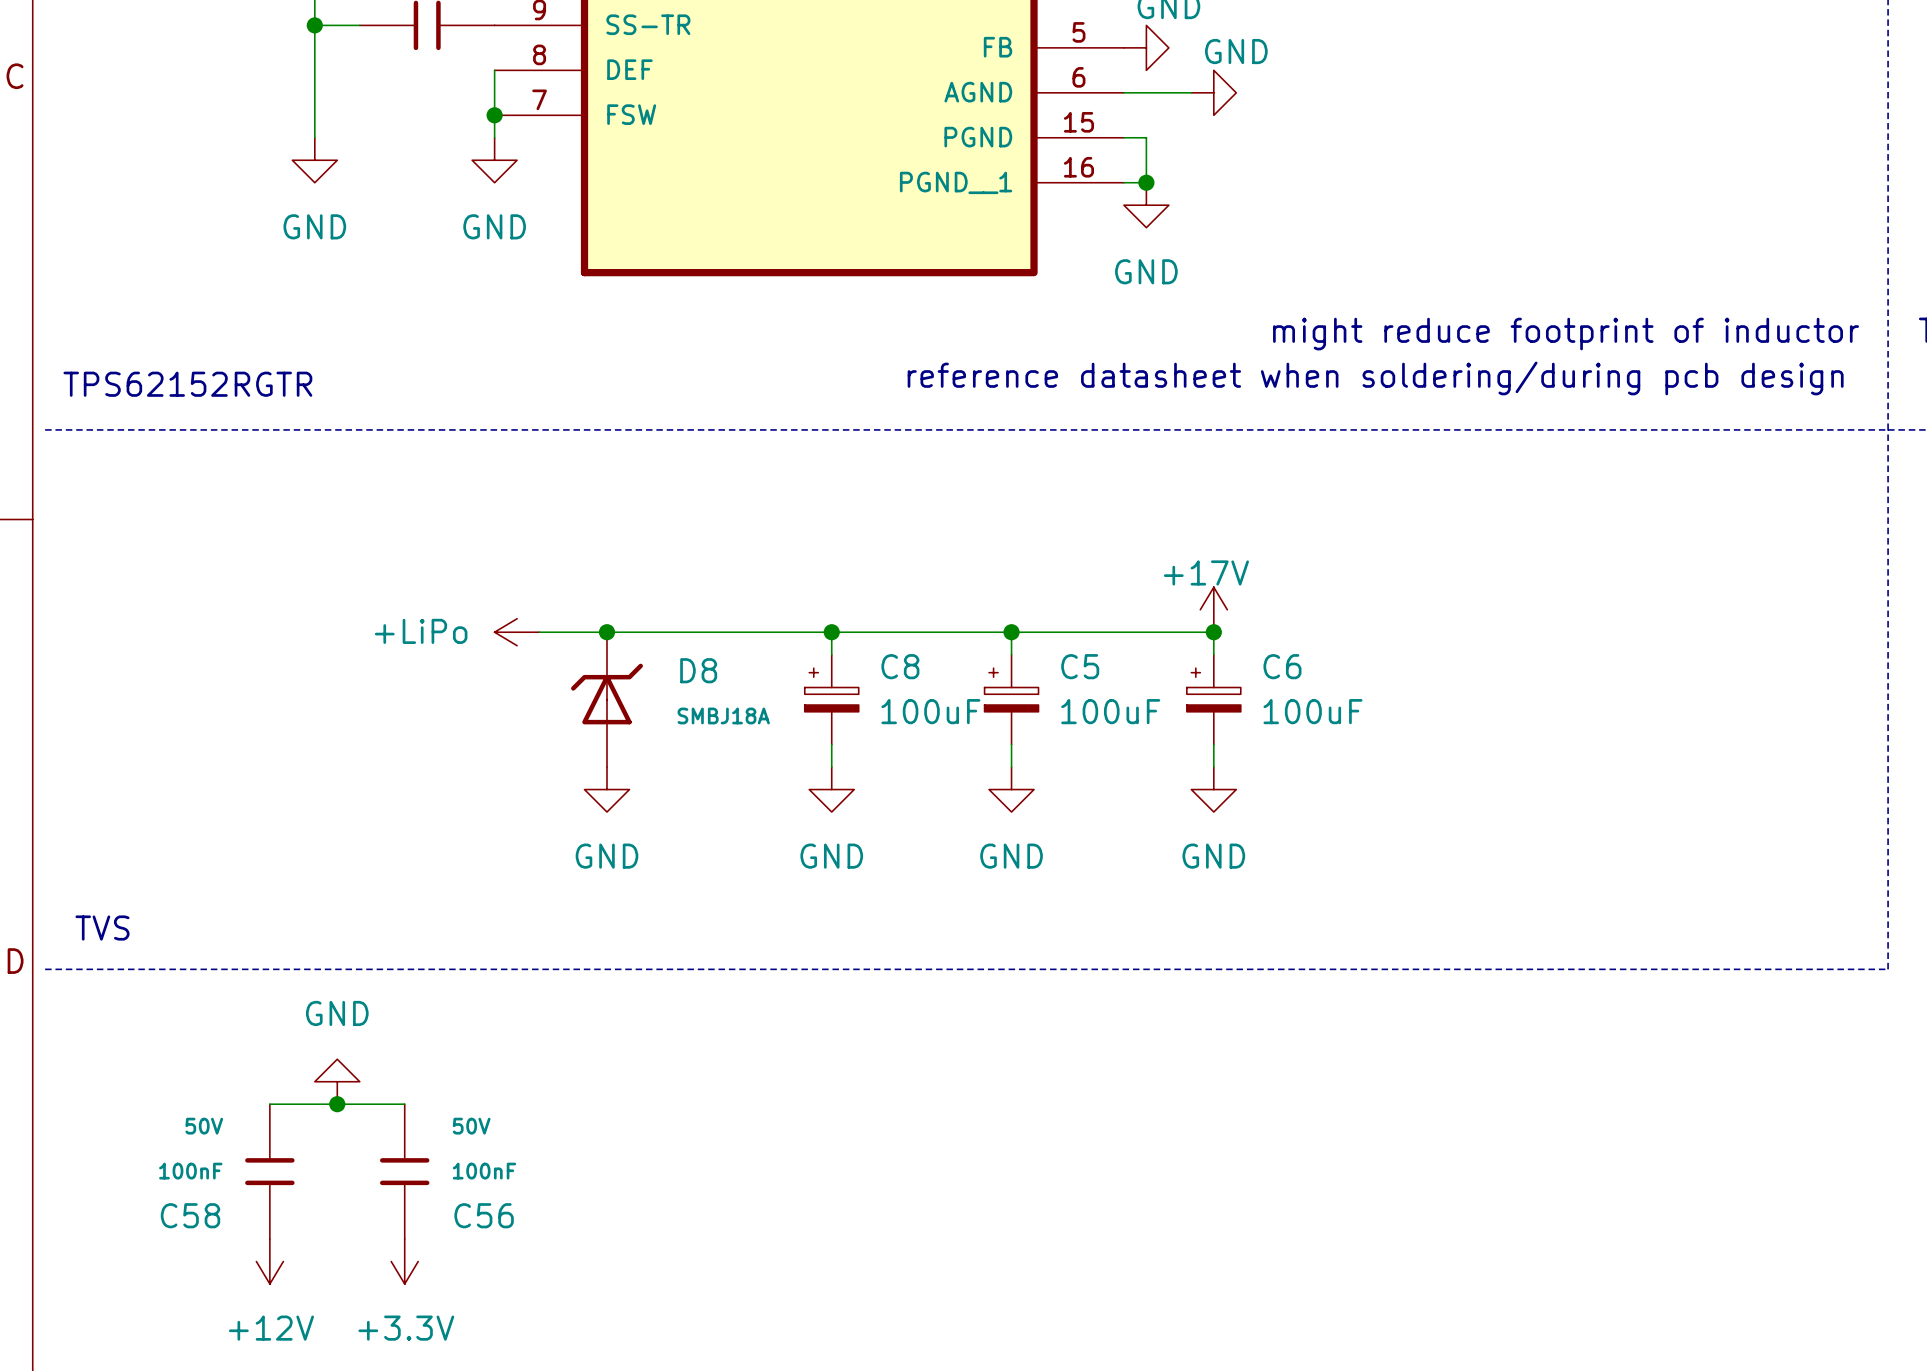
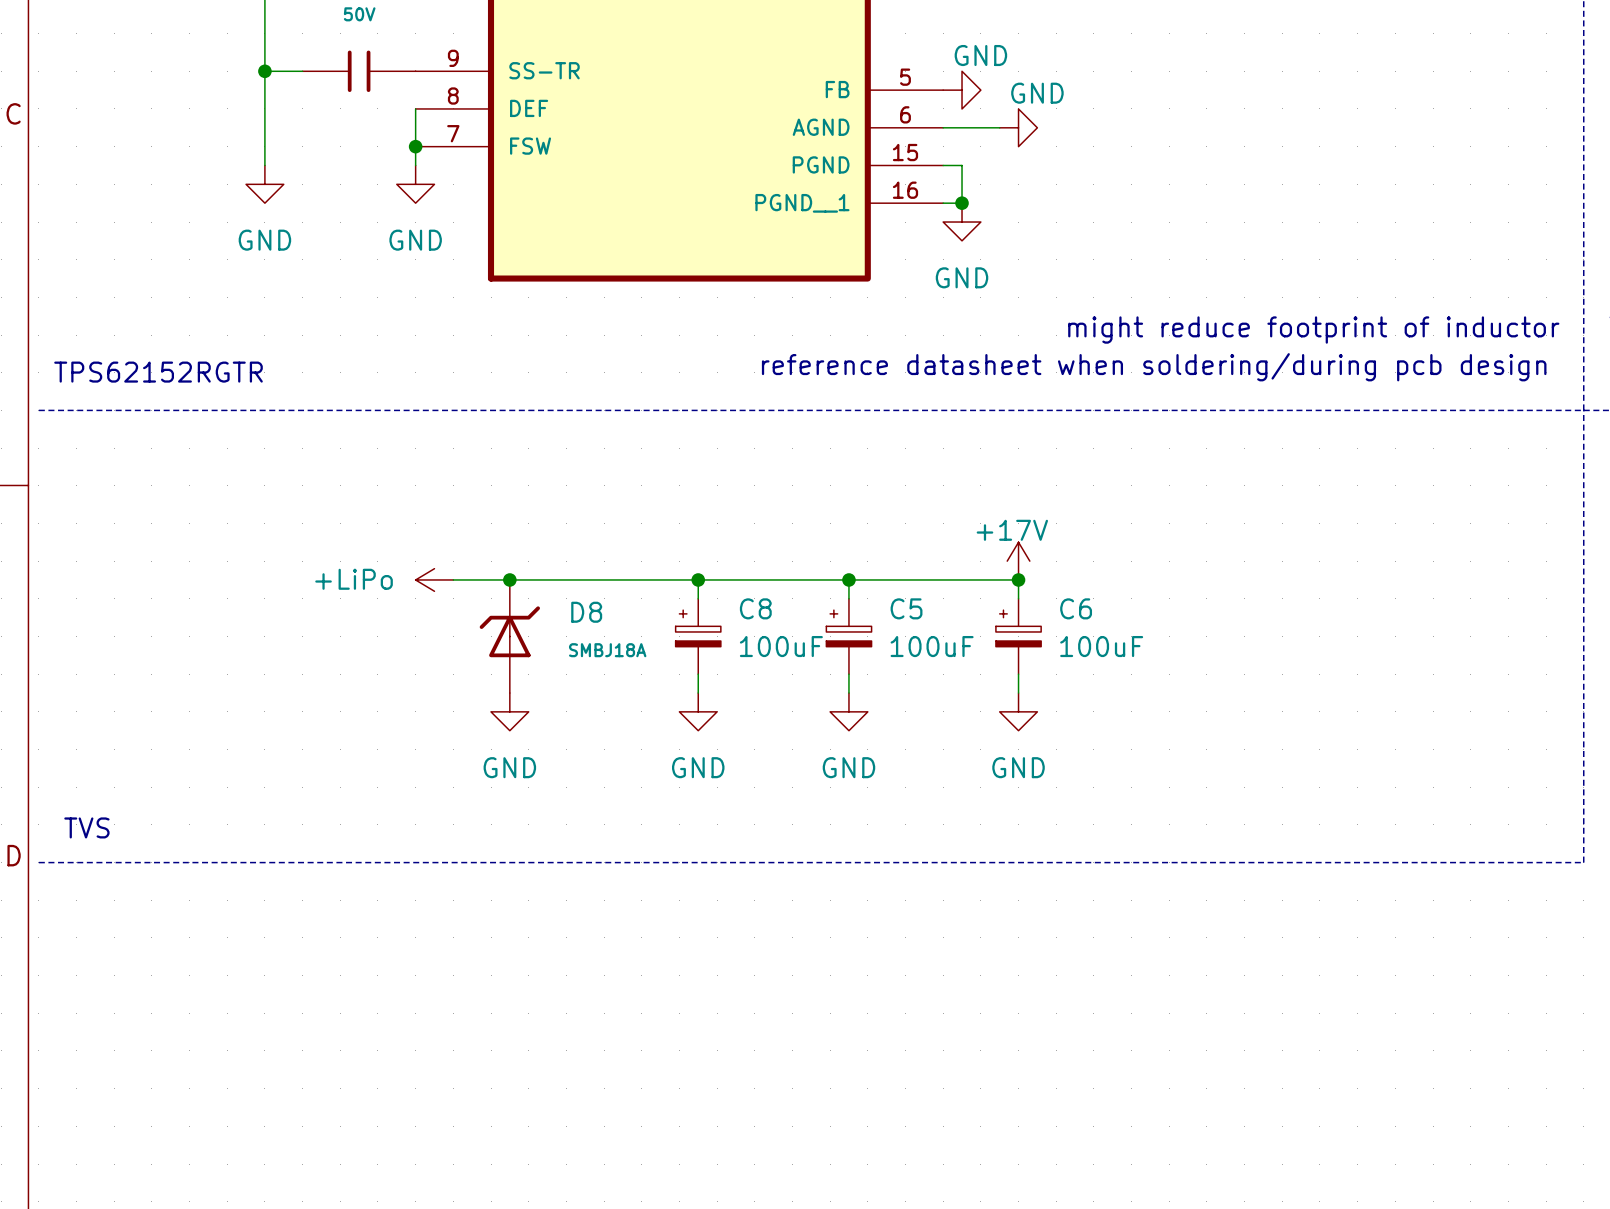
power symbol: GND (337, 1081) -> none
wire: (269, 1104) (404, 1104) -> none
junction: (337, 1104) -> none
C58: 100nF (269, 1171) -> none
C56: 100nF (404, 1171) -> none
power symbol: +12V (269, 1261) -> none
power symbol: +3.3V (404, 1261) -> none

